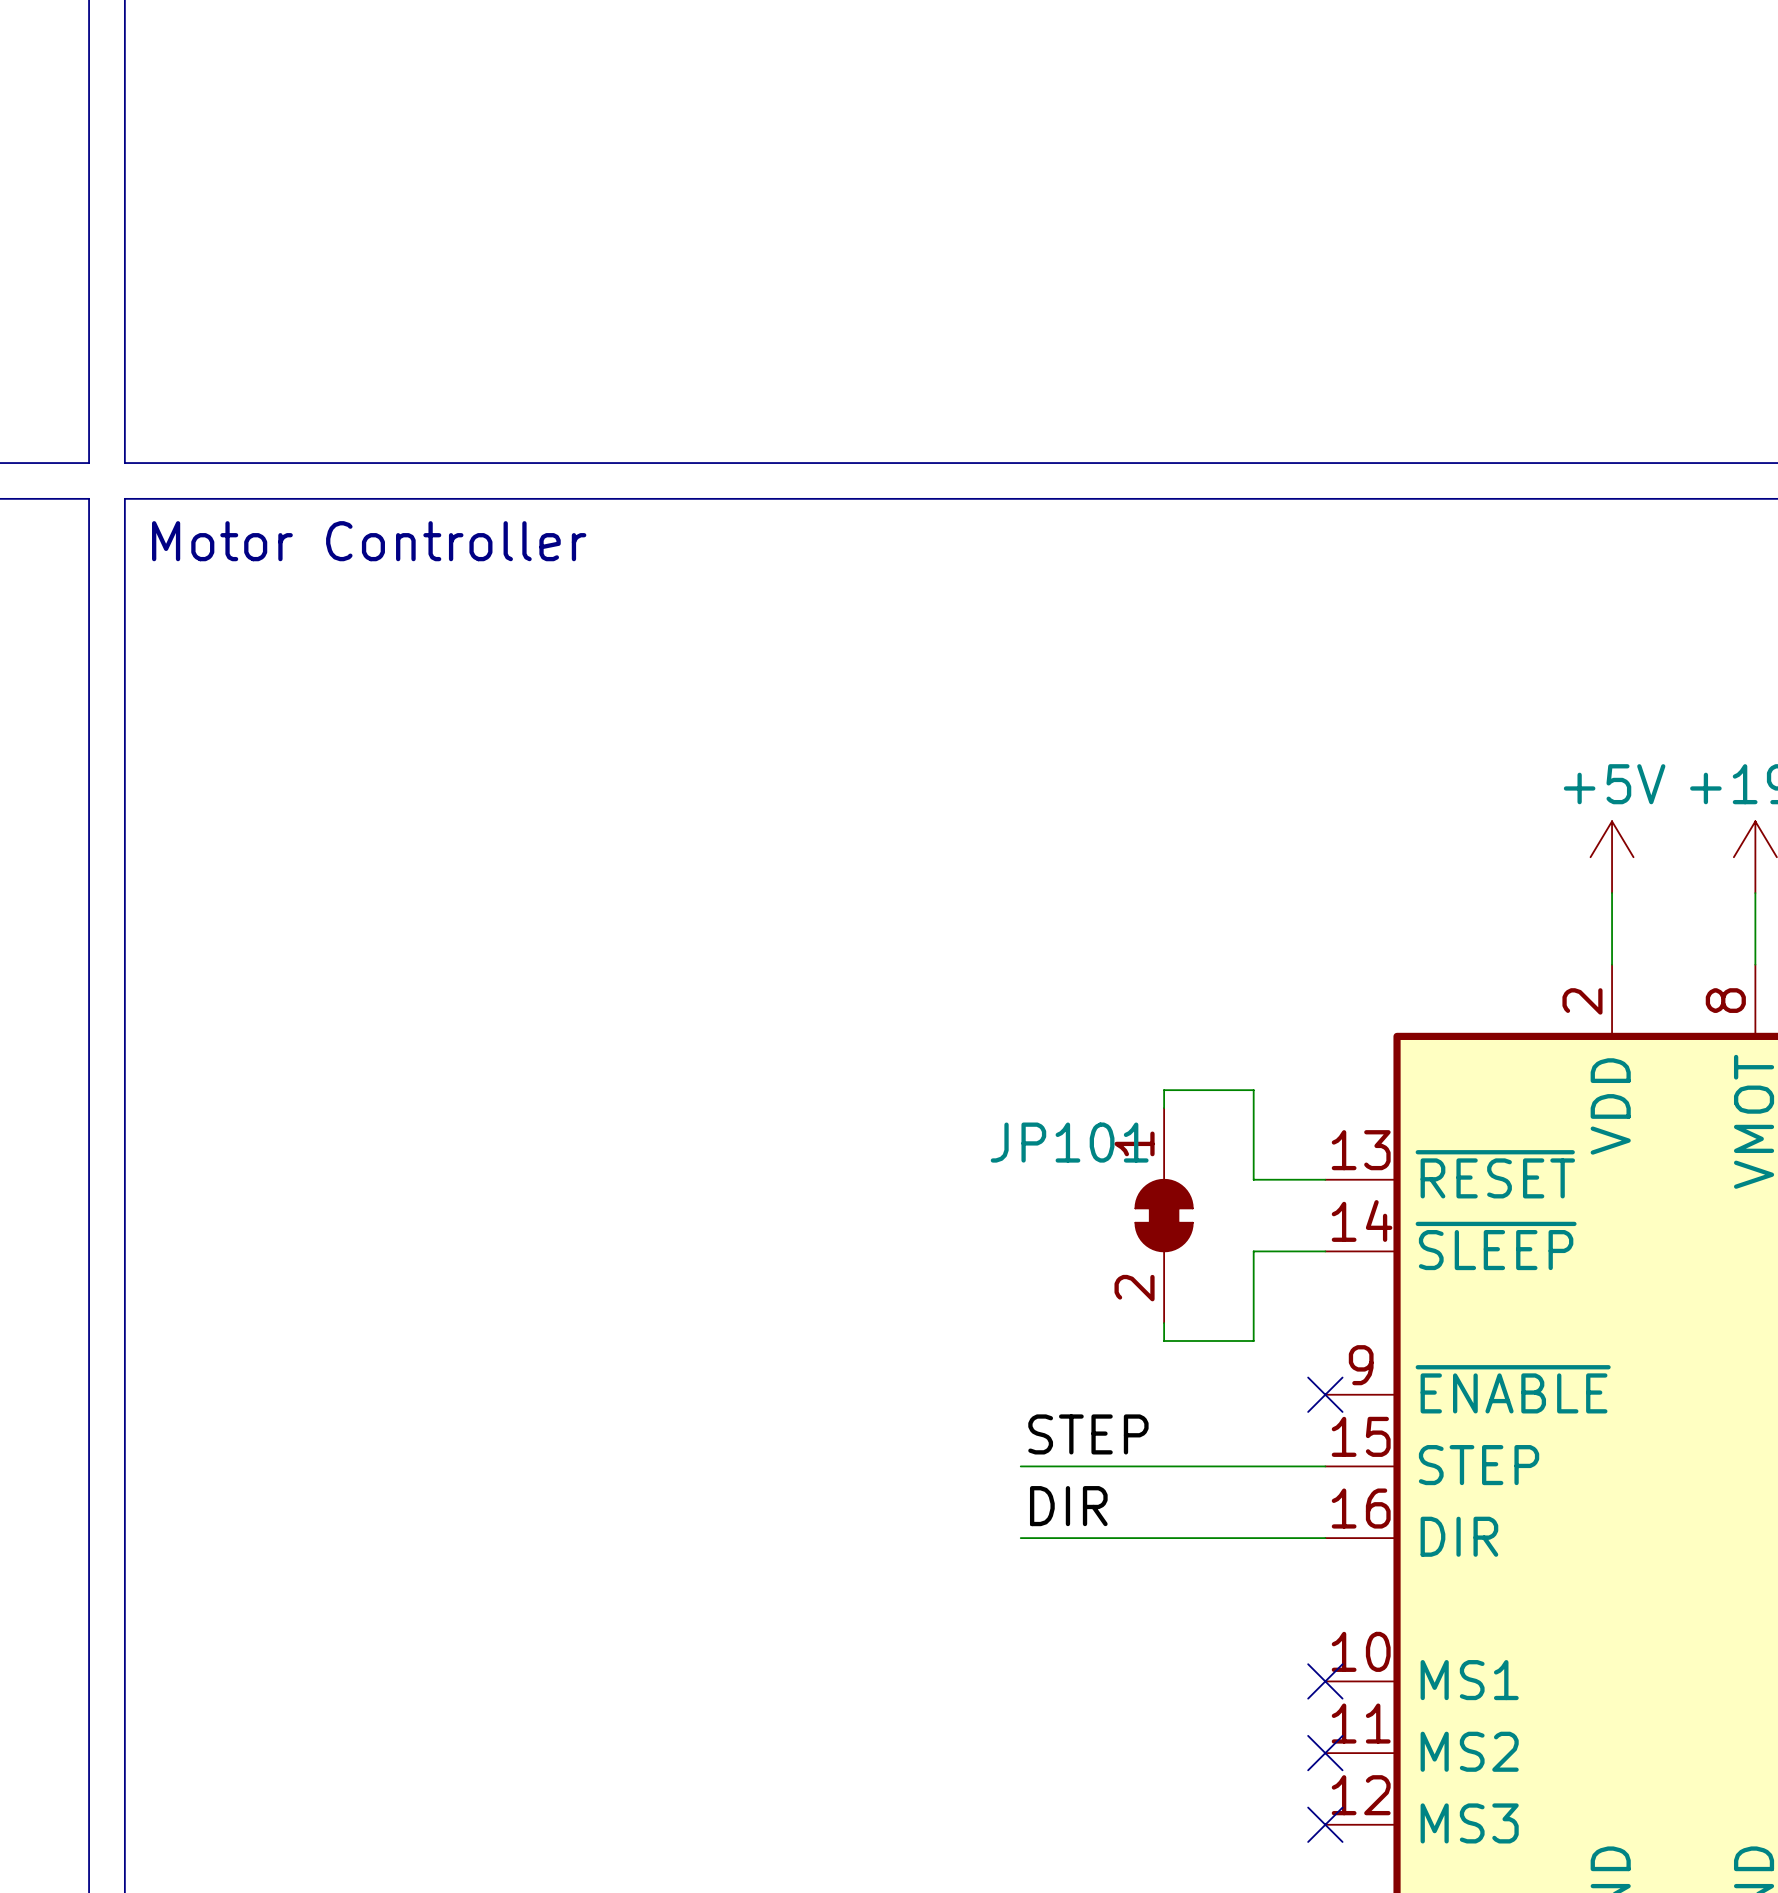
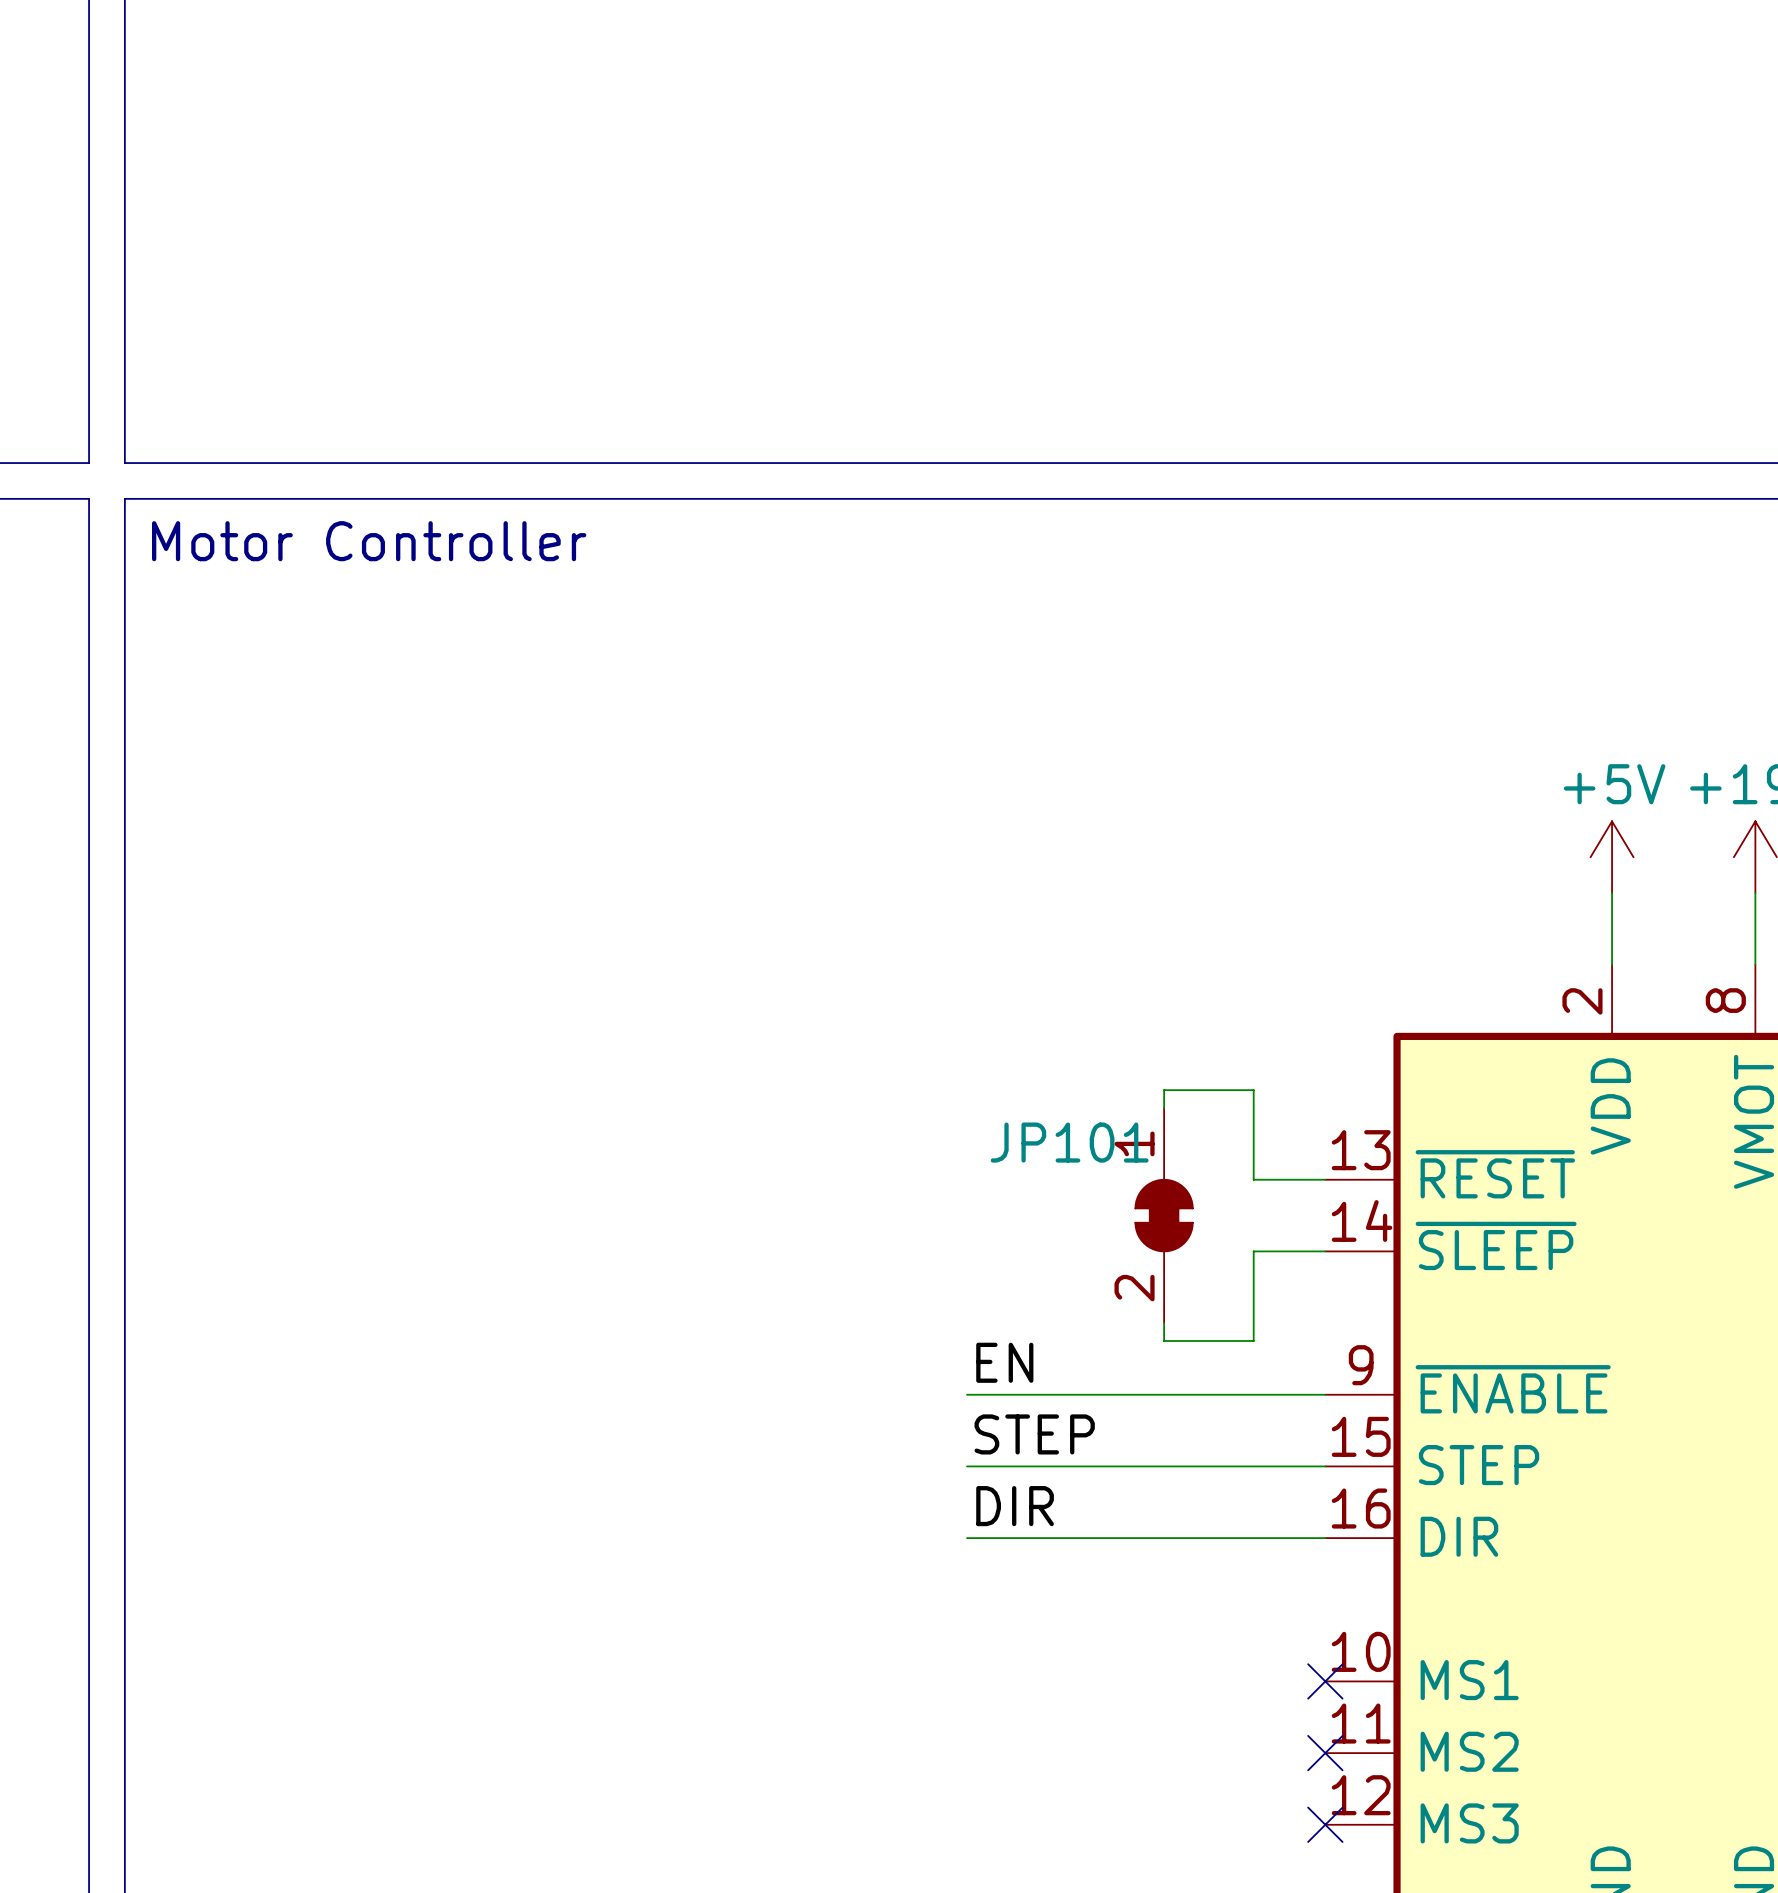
label: none -> EN (1004, 1362)
wire: none -> (967, 1394) (1325, 1394)
no-connect mark: (1325, 1394) -> none
label position: STEP (1088, 1434) -> STEP (1034, 1434)
wire: none -> (967, 1466) (1020, 1466)
label position: DIR (1068, 1506) -> DIR (1015, 1506)
wire: none -> (967, 1538) (1020, 1538)

